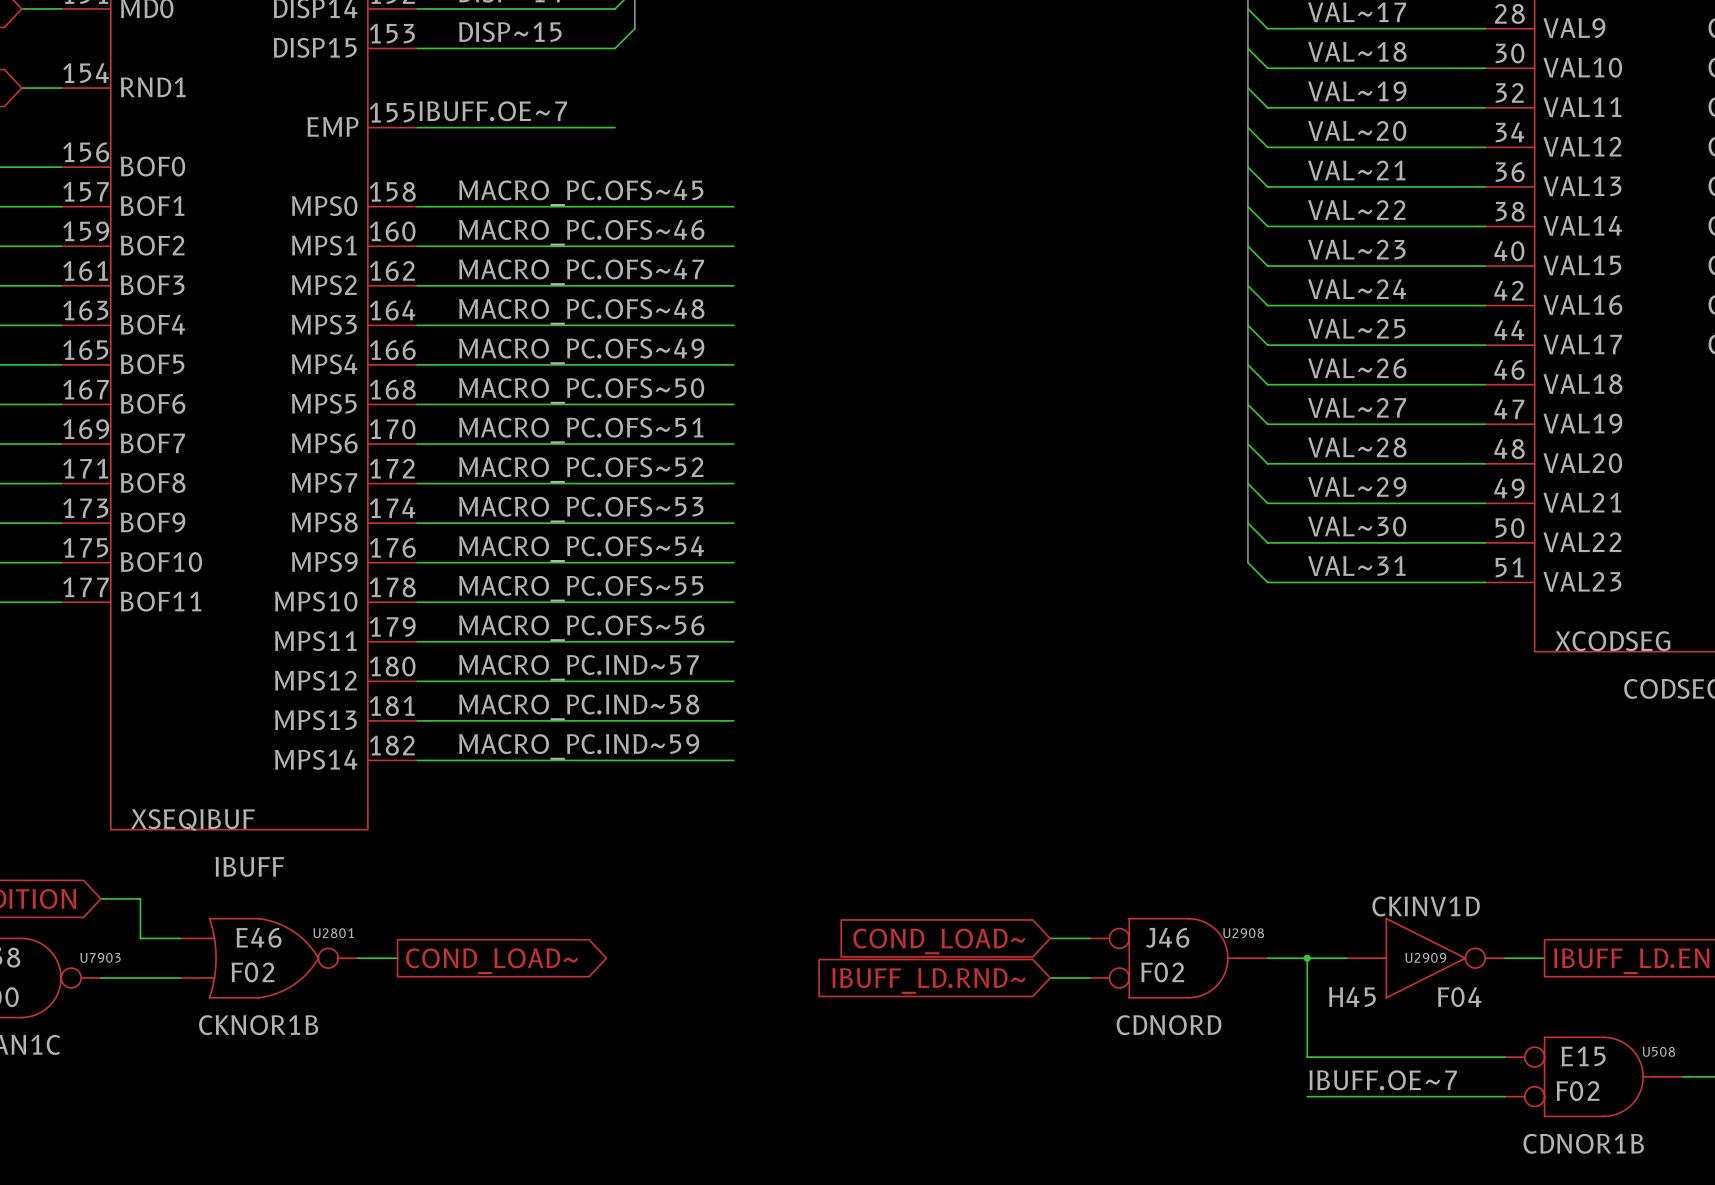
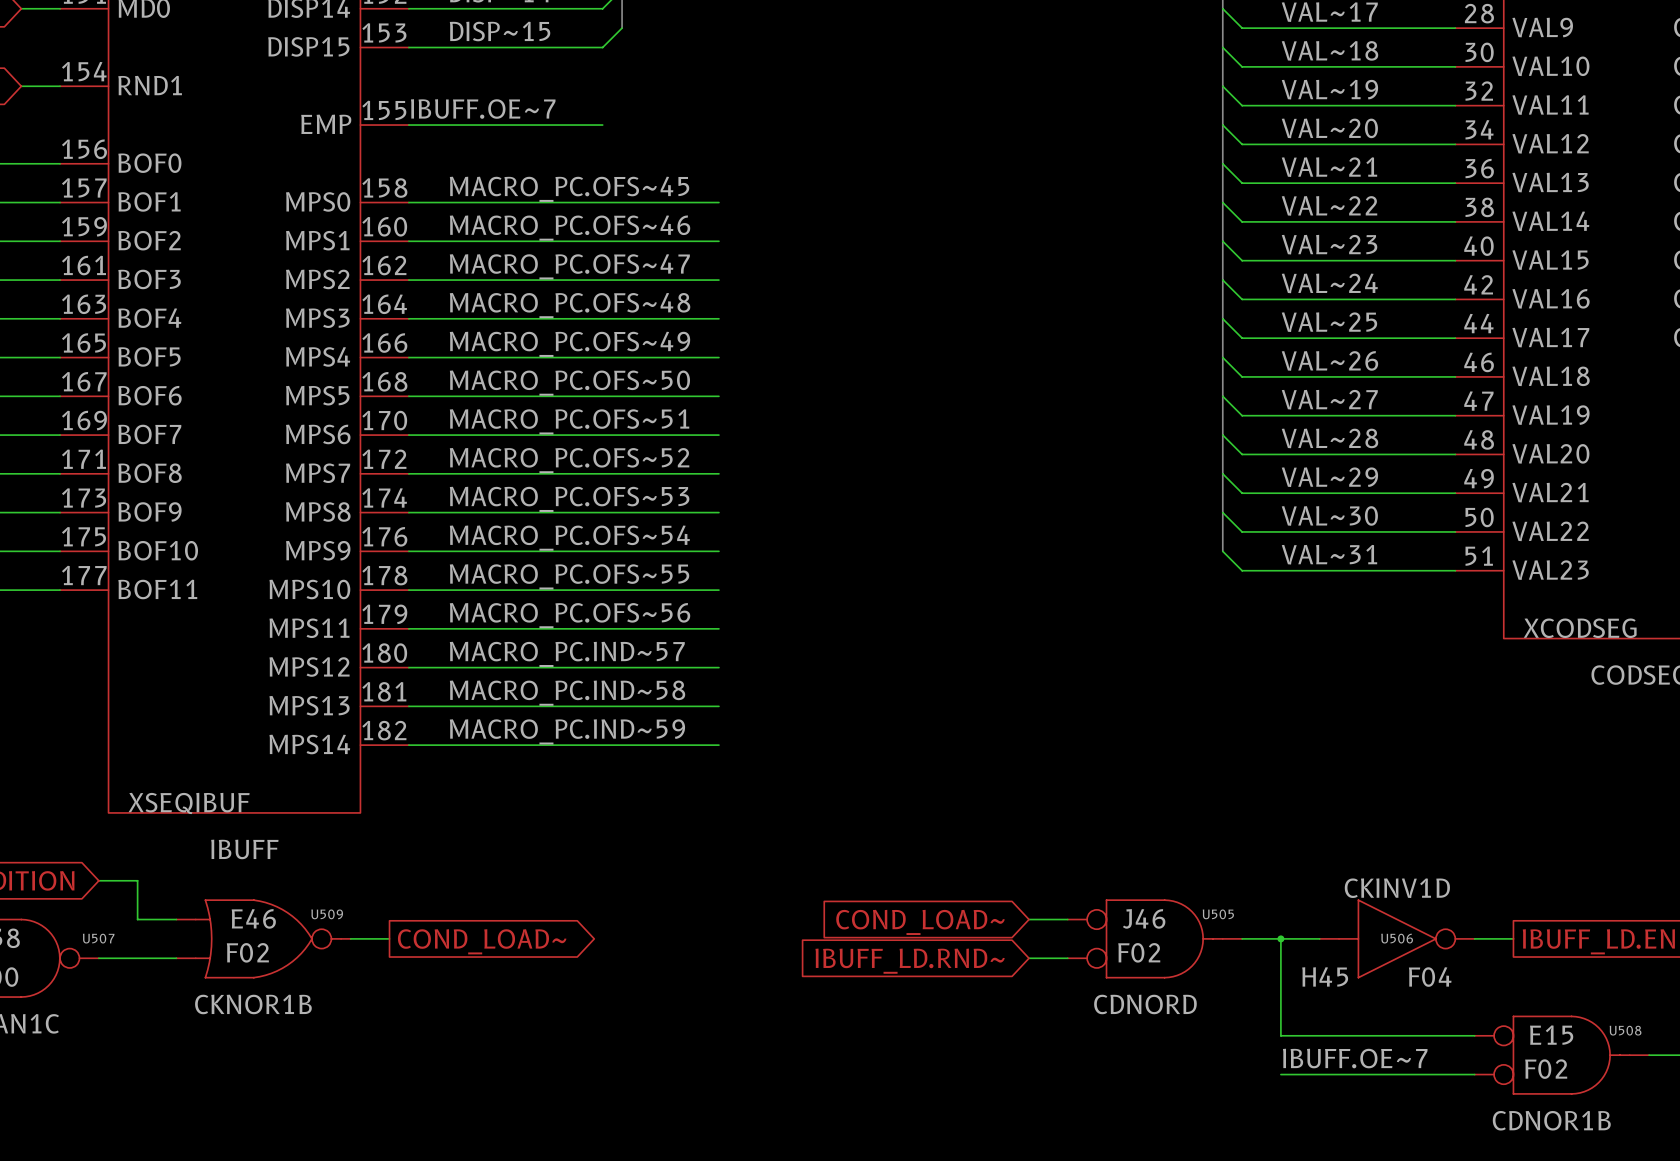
U2801 name: U2801 (333, 933) -> U509 (327, 914)
U2908 name: U2908 (1243, 933) -> U505 (1218, 914)
U7903 name: U7903 (100, 957) -> U507 (98, 938)
U2909 name: U2909 (1425, 957) -> U506 (1397, 938)

